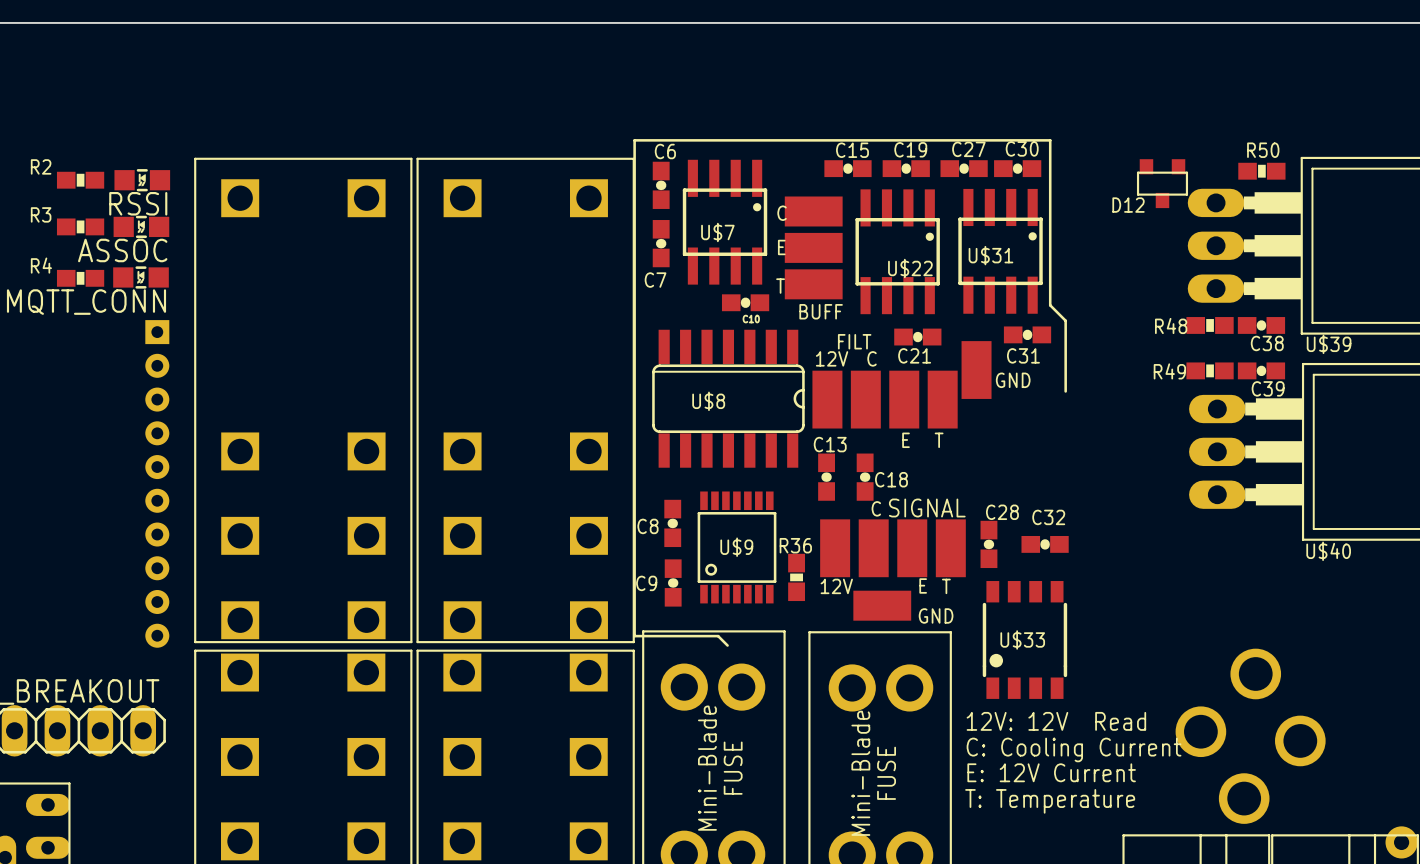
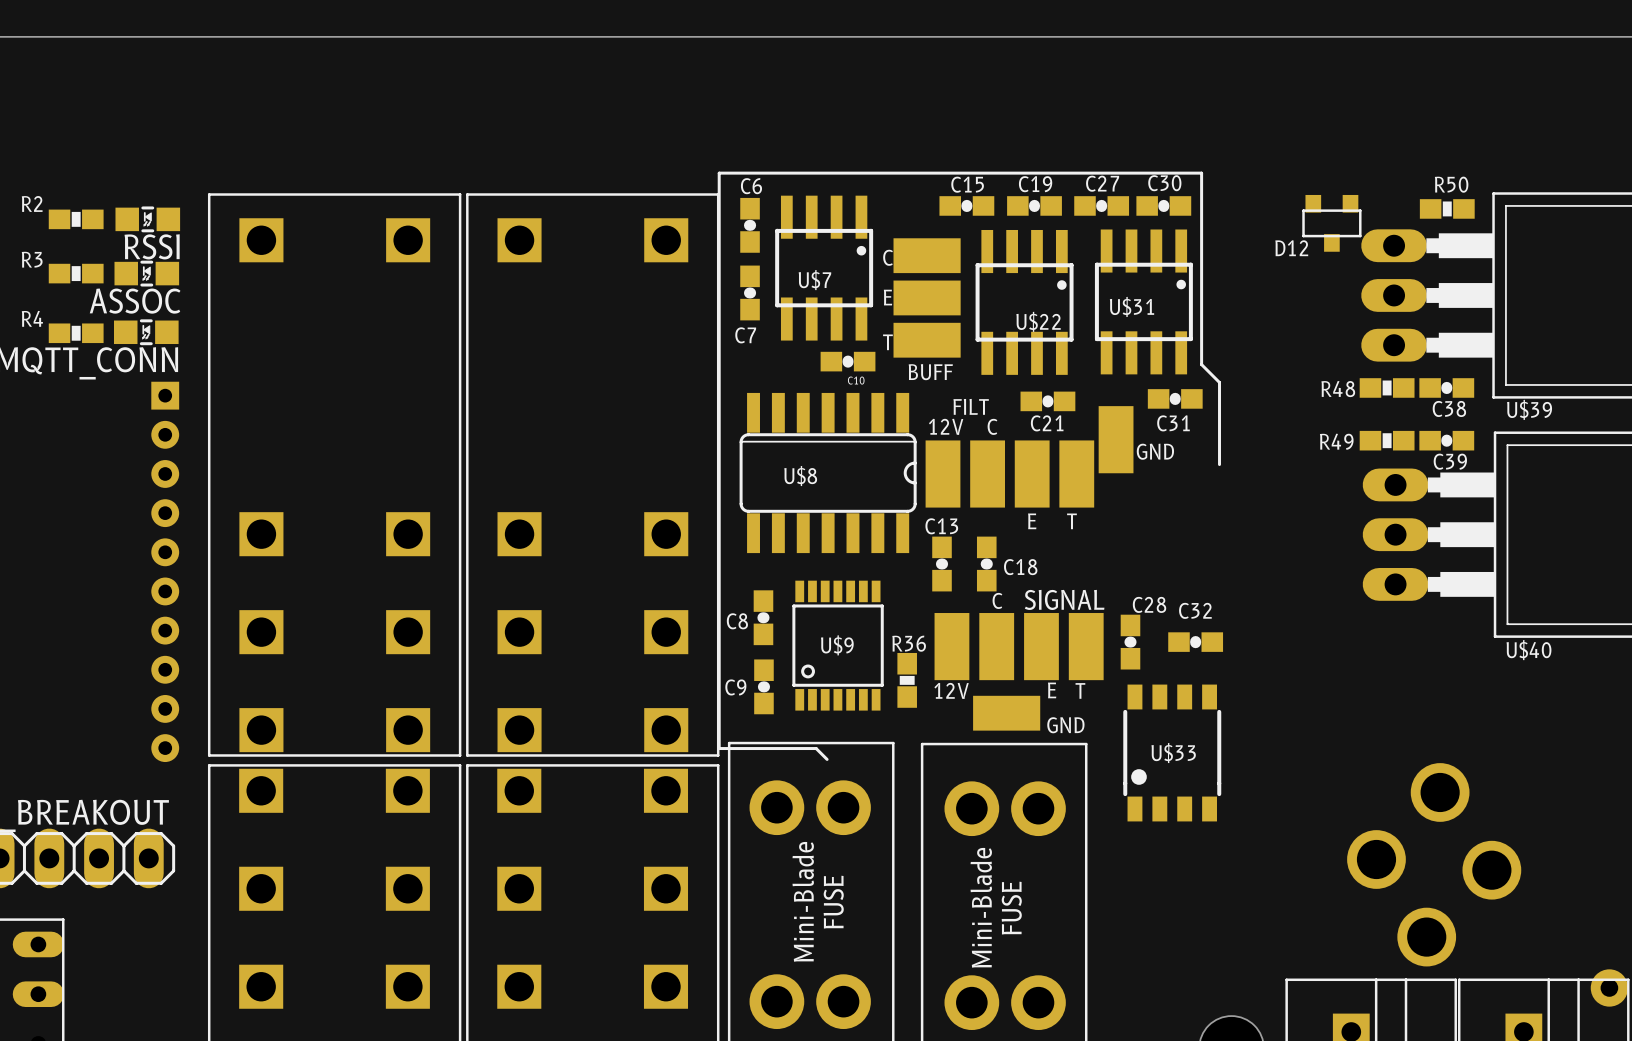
text: 12V: 12V Read (1056, 721) -> none
text: C: Cooling Current (1074, 749) -> none
text: E: 12V Current (1051, 772) -> none
text: T: Temperature (1050, 801) -> none

